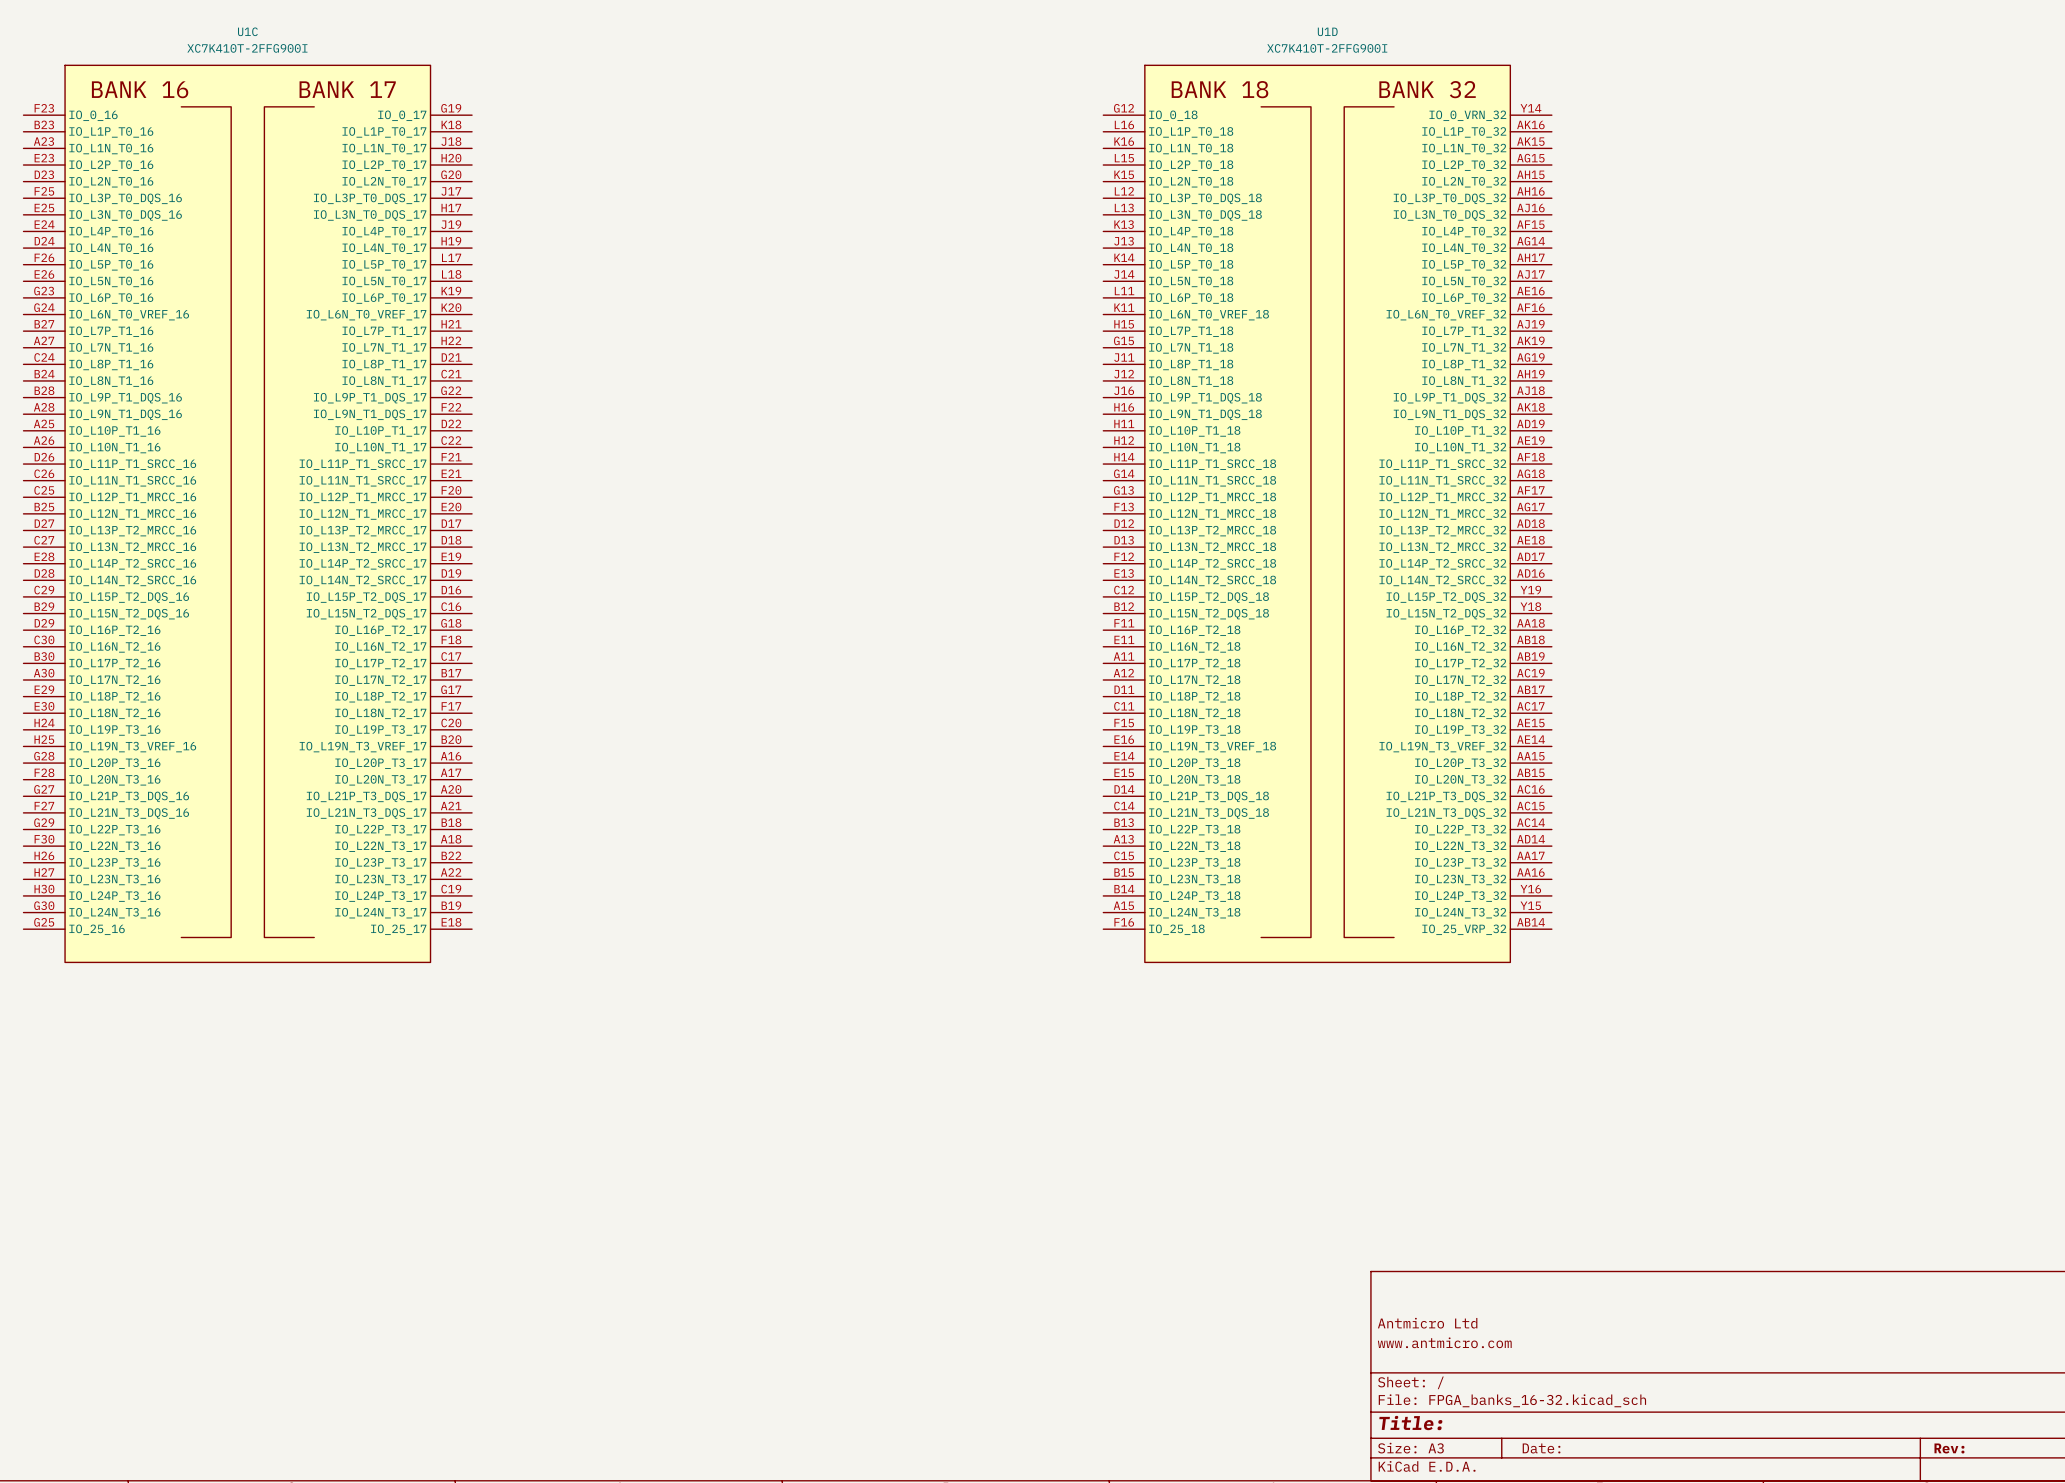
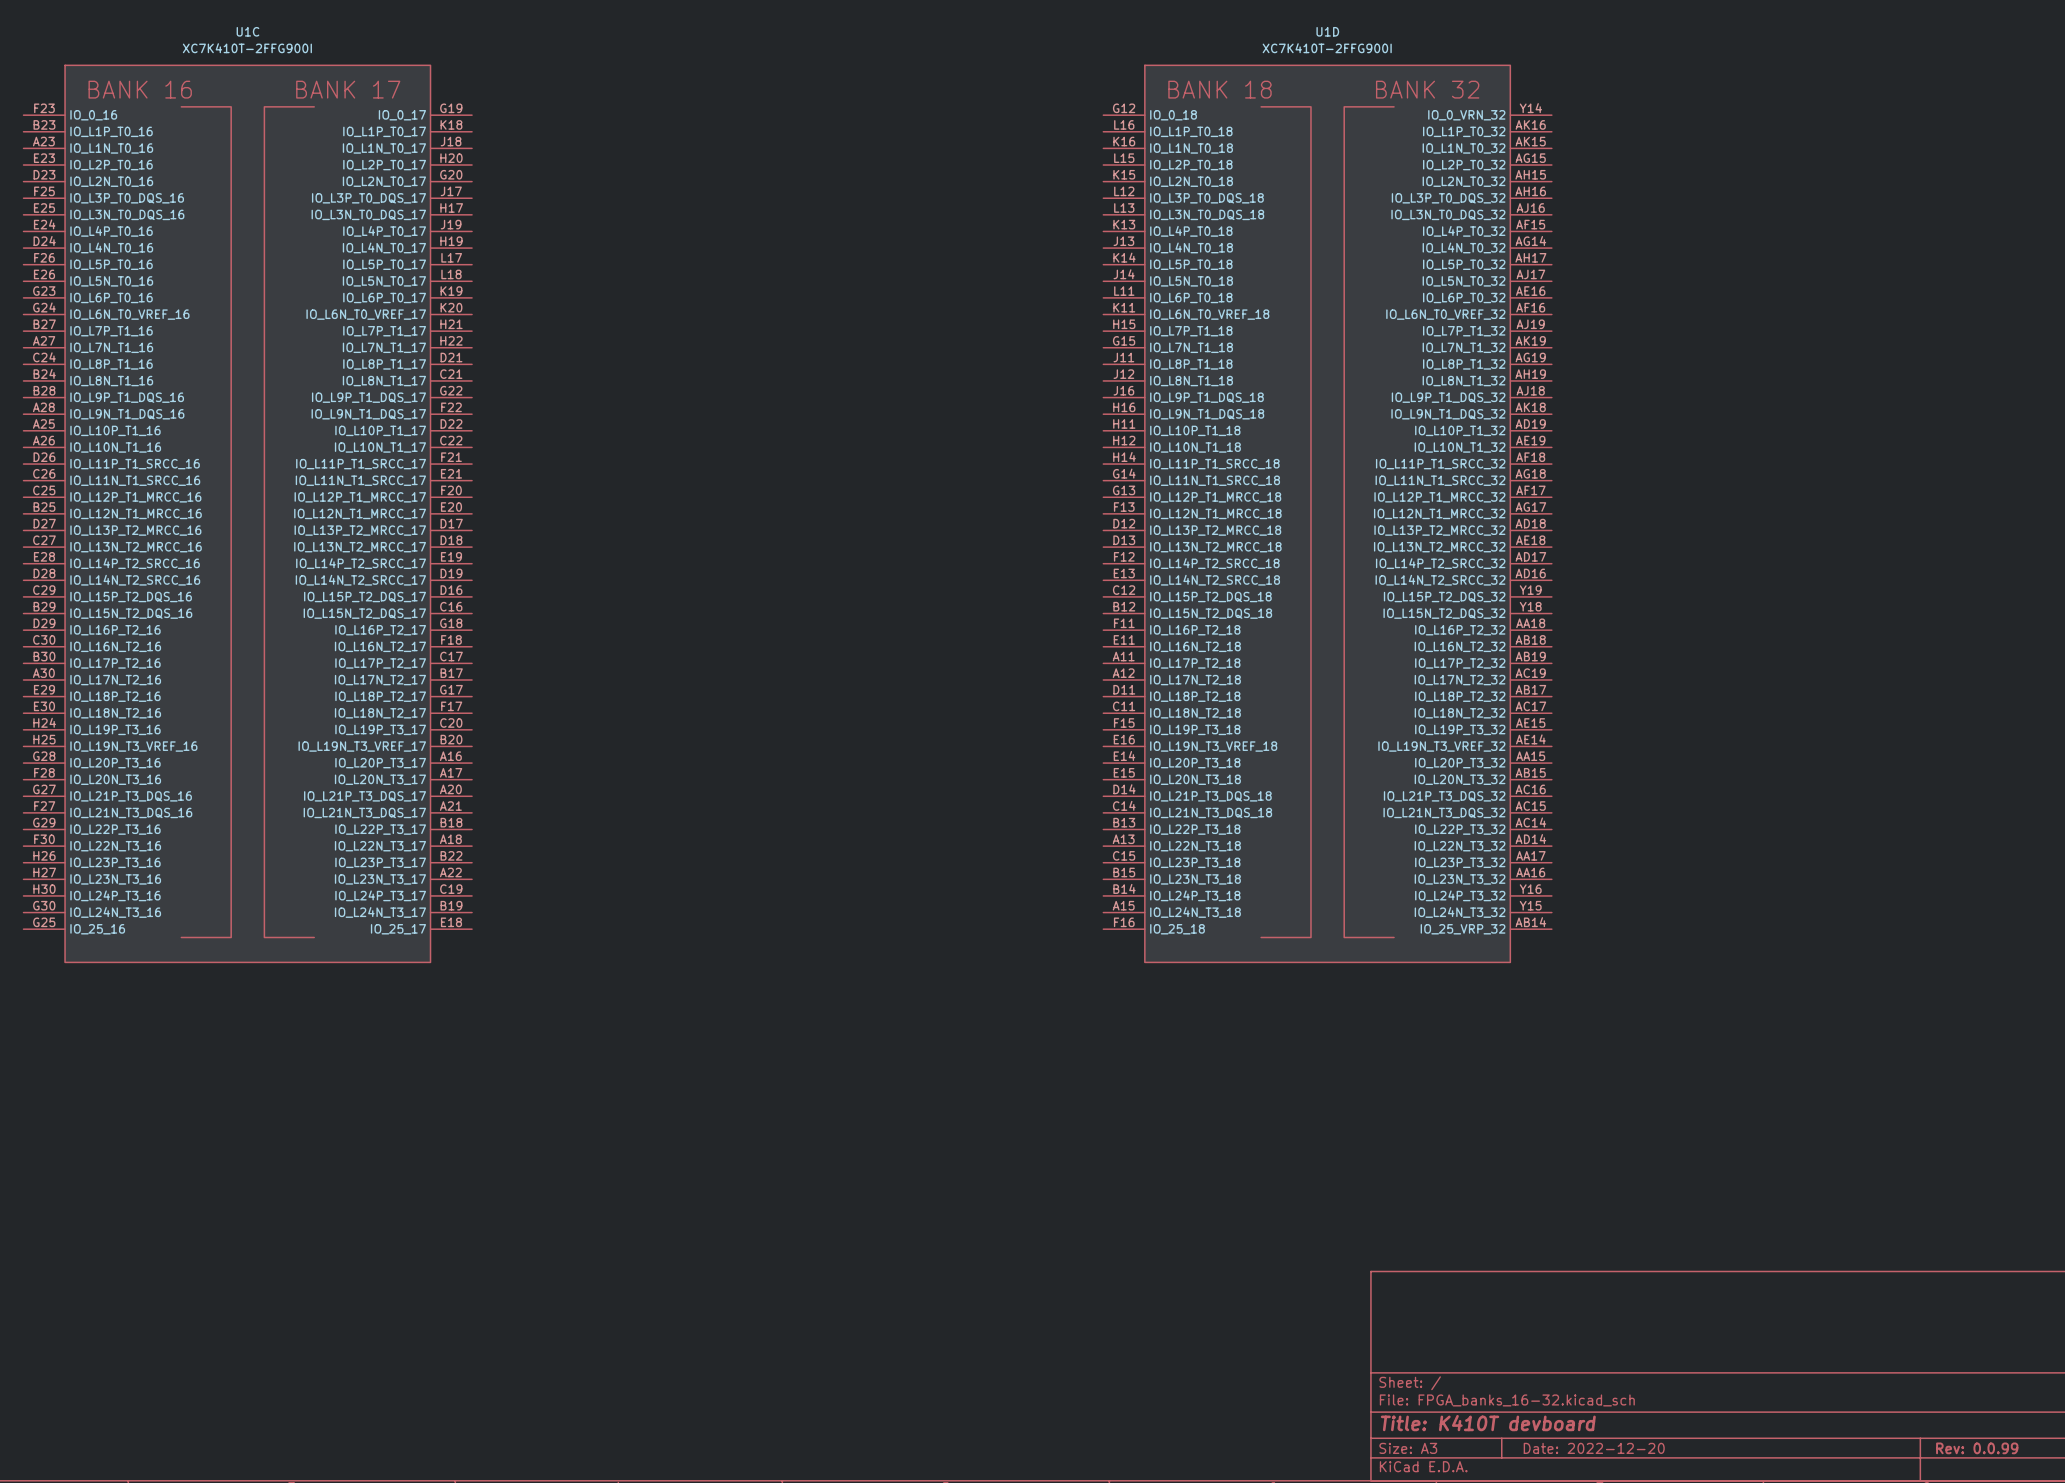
title block: Antmicro Ltd (1427, 1323) -> none
title block: www.antmicro.com (1444, 1342) -> none
title block: Title: (1410, 1423) -> Title: K410T devboard (1488, 1423)
title block: Date: (1541, 1448) -> Date: 2022-12-20 (1594, 1448)
title block: Rev: (1949, 1448) -> Rev: 0.0.99 (1977, 1448)

